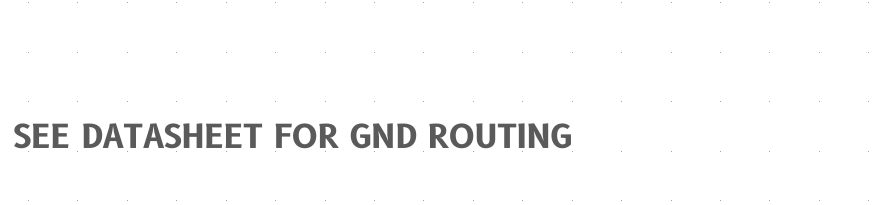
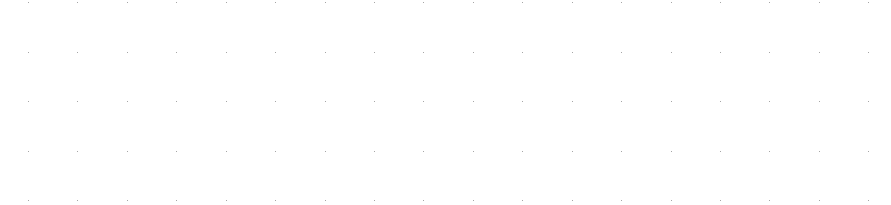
text: SEE DATASHEET FOR GND ROUTING (292, 135) -> none

